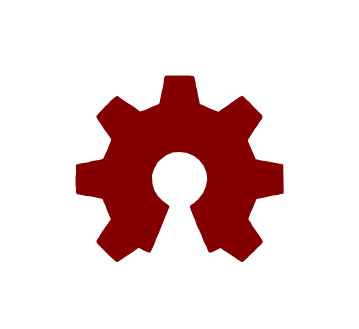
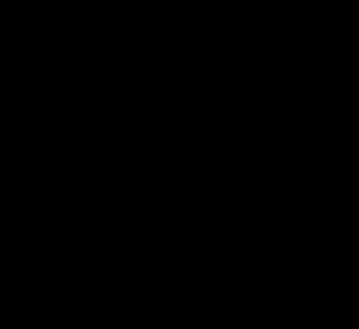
power symbol: (179, 168) -> none

